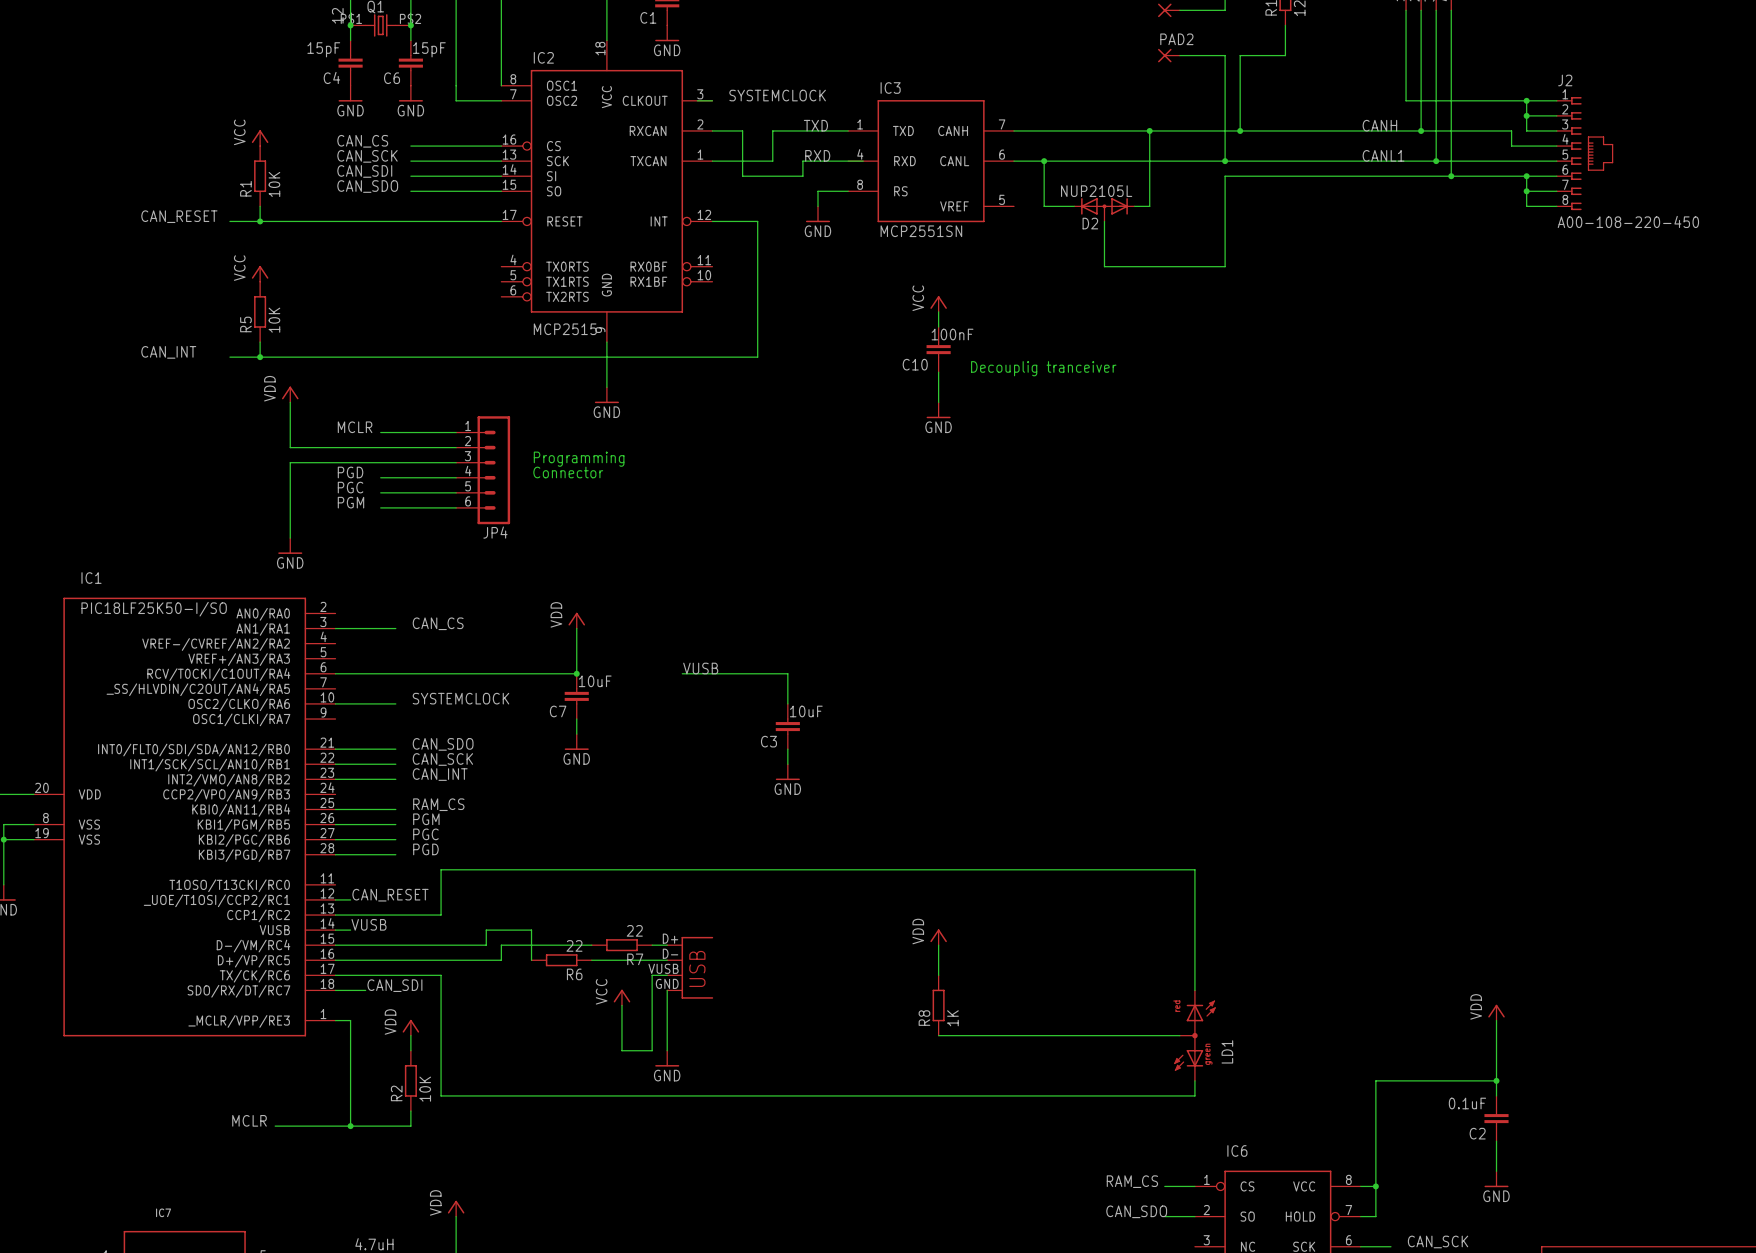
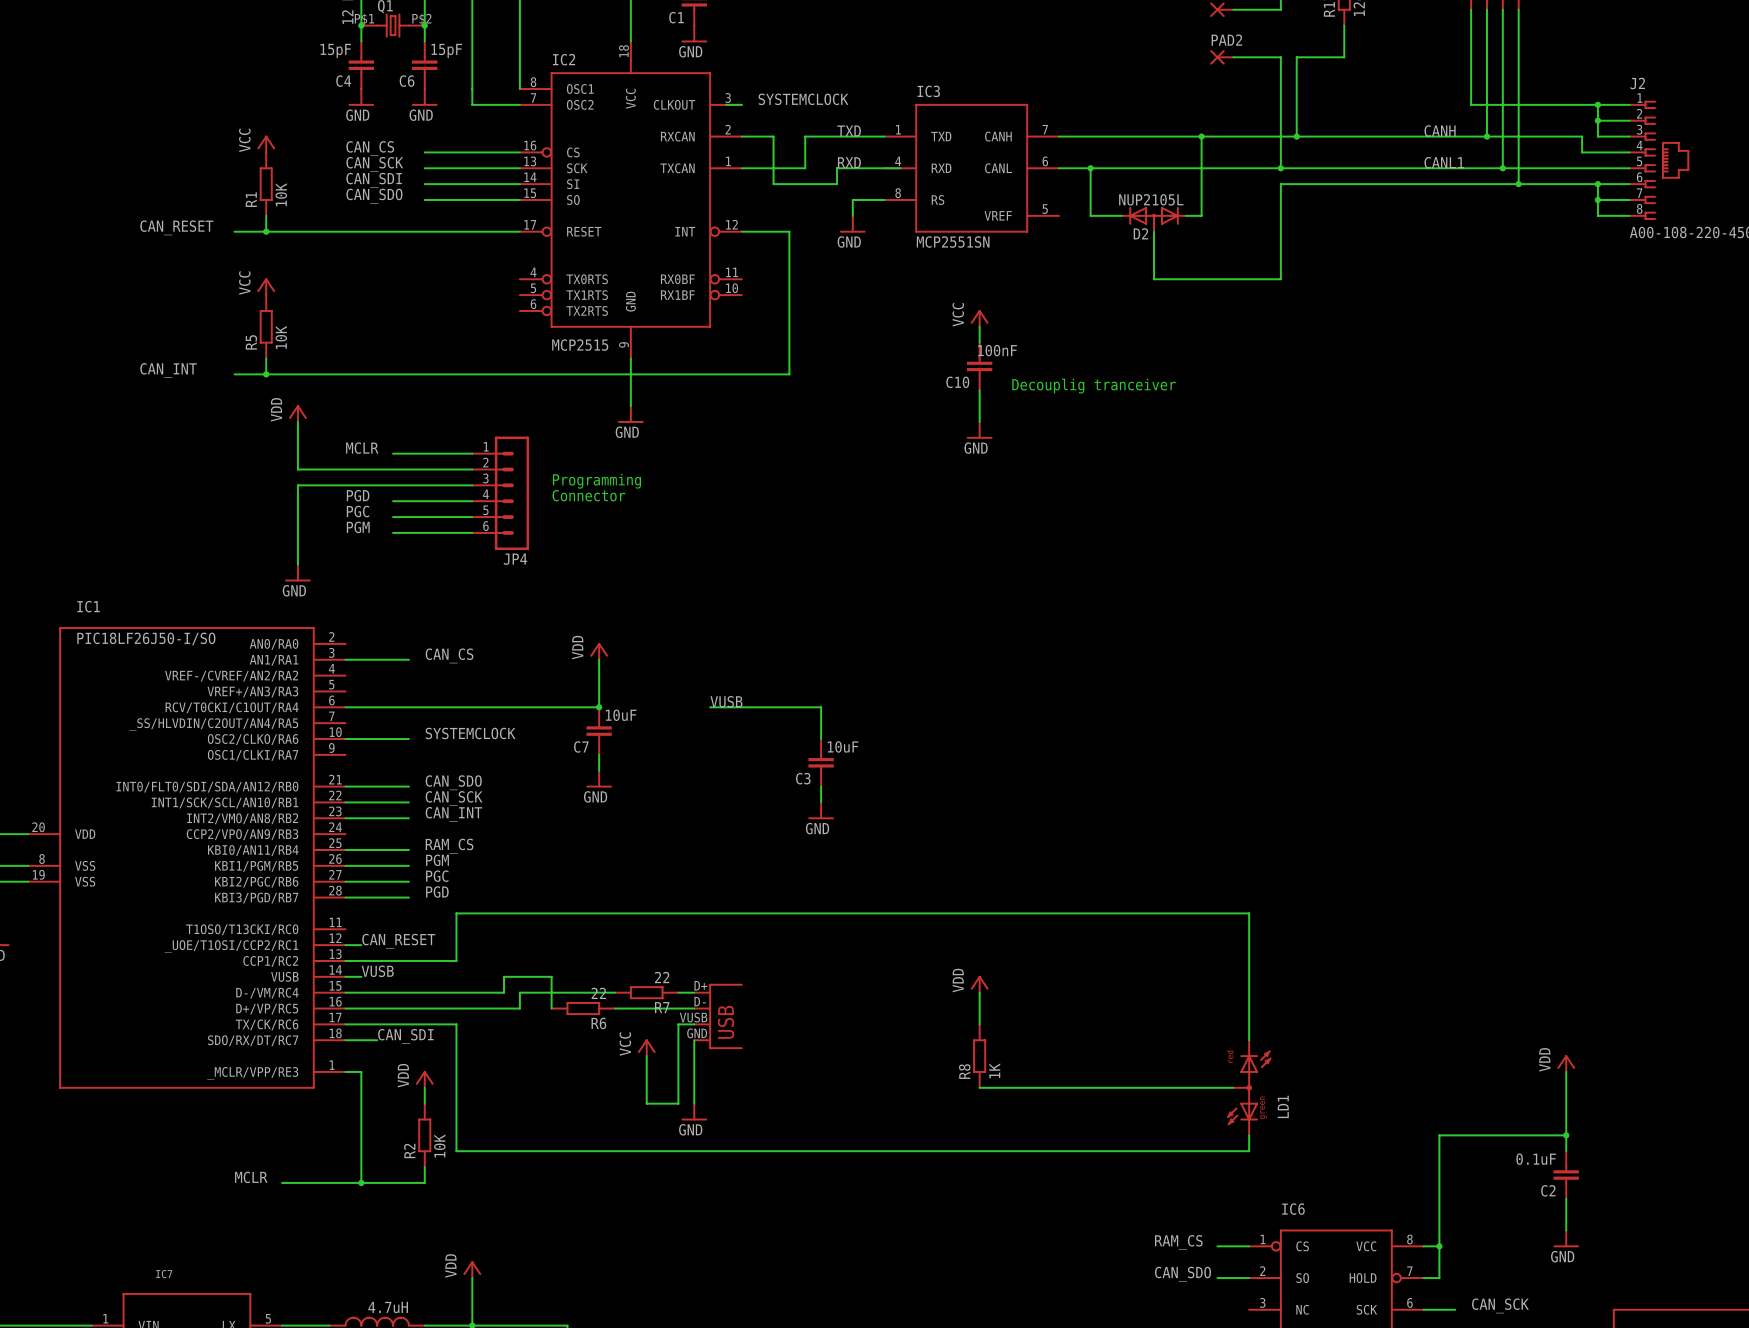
IC1 value: PIC18LF25K50-I/SO (154, 609) -> PIC18LF26J50-I/SO (146, 638)

